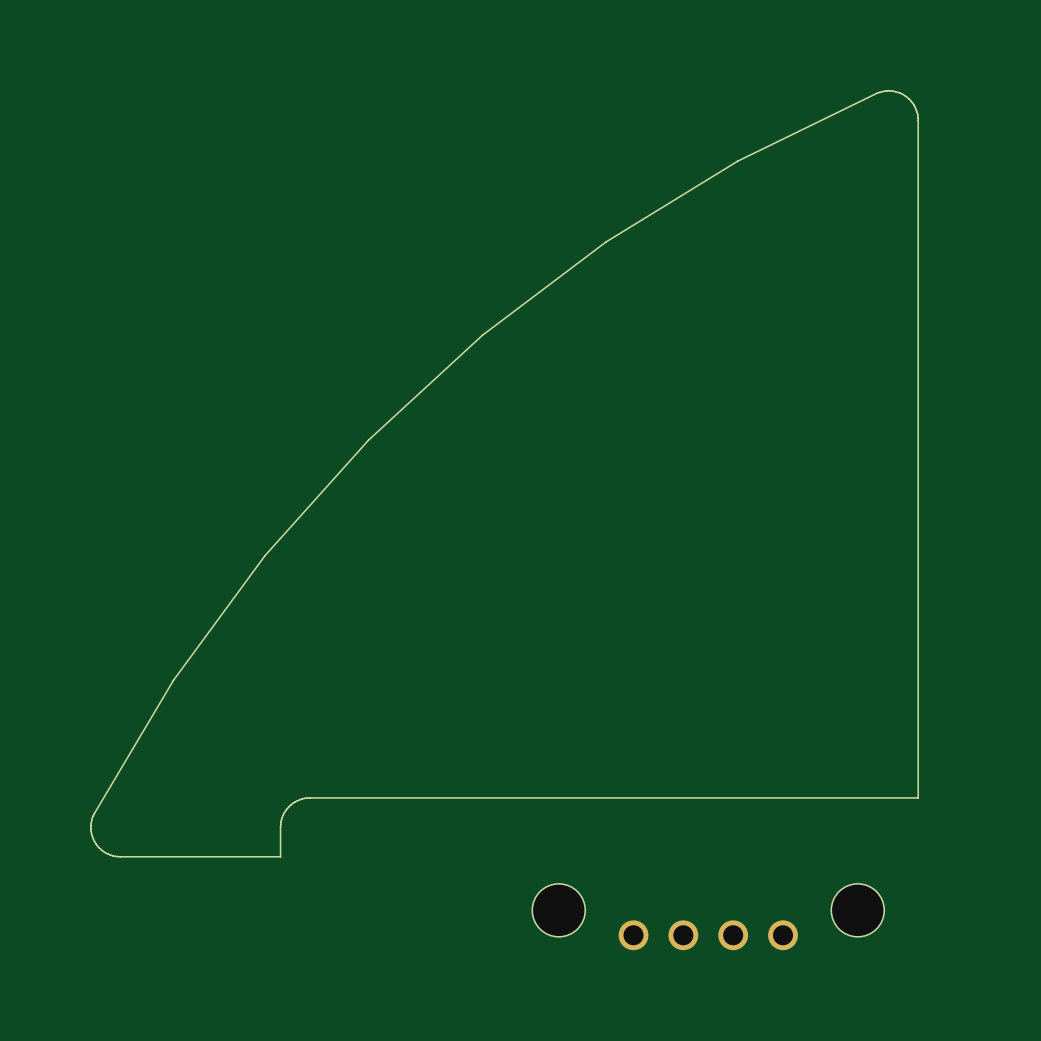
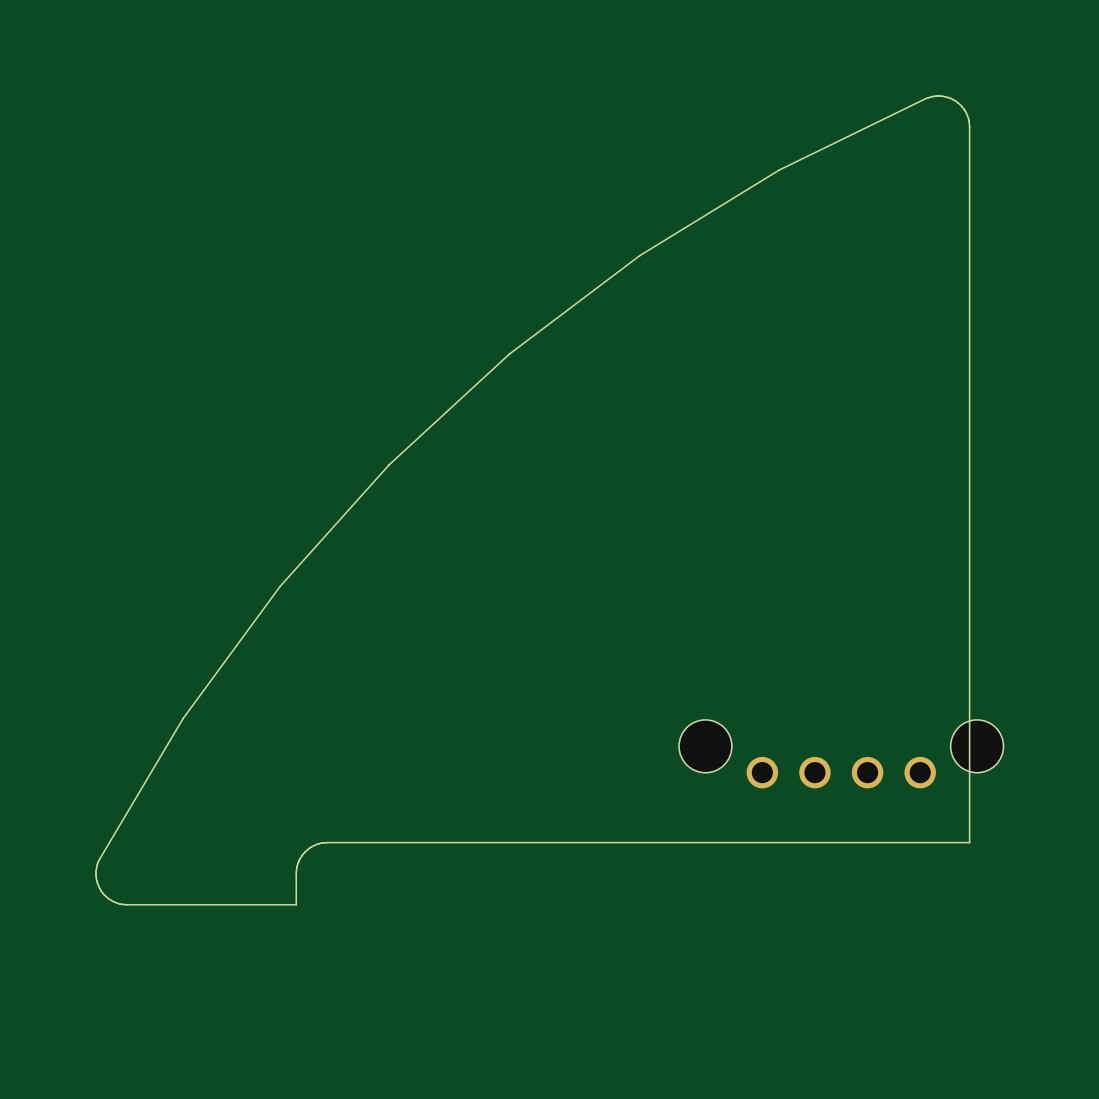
part: none -> (841, 754)
part: (708, 917) -> none

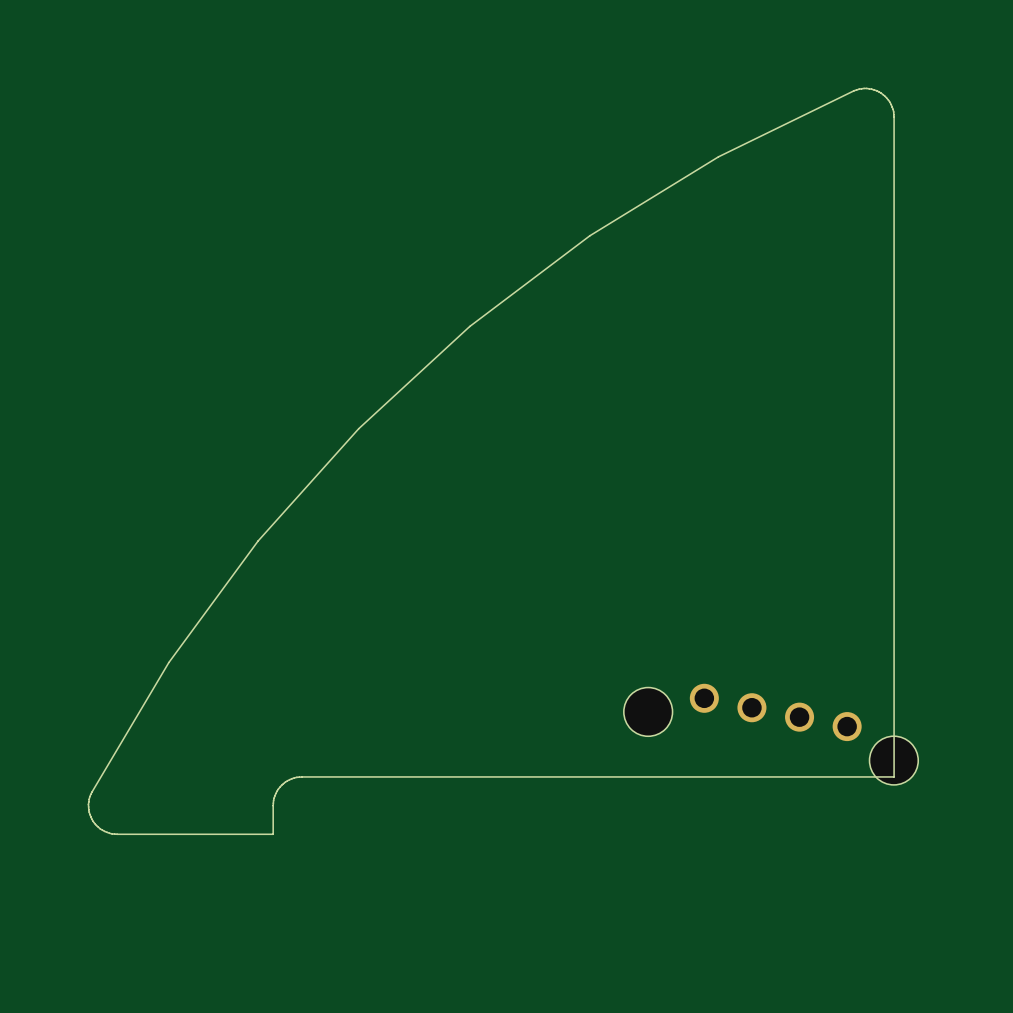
part: (841, 754) -> none
part: none -> (771, 734)

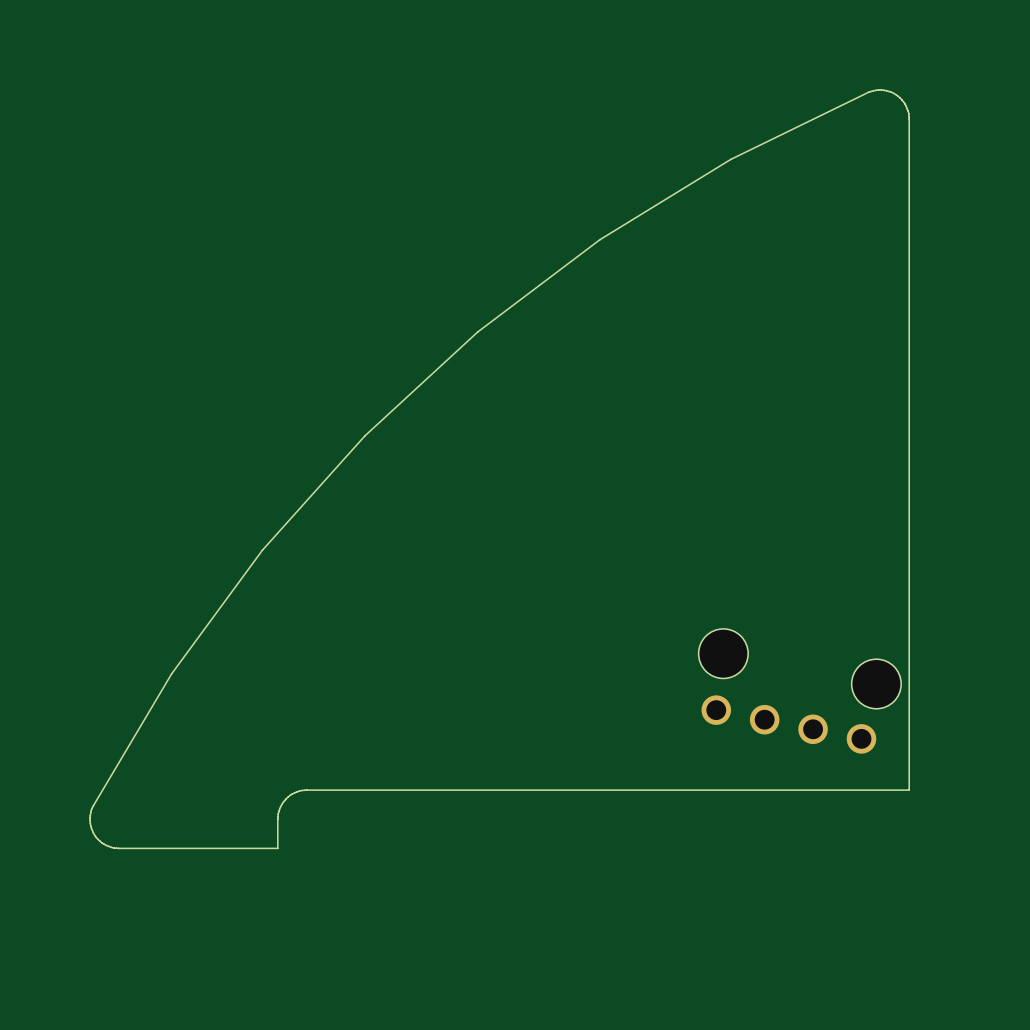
part: none -> (799, 691)
part: (771, 734) -> none

